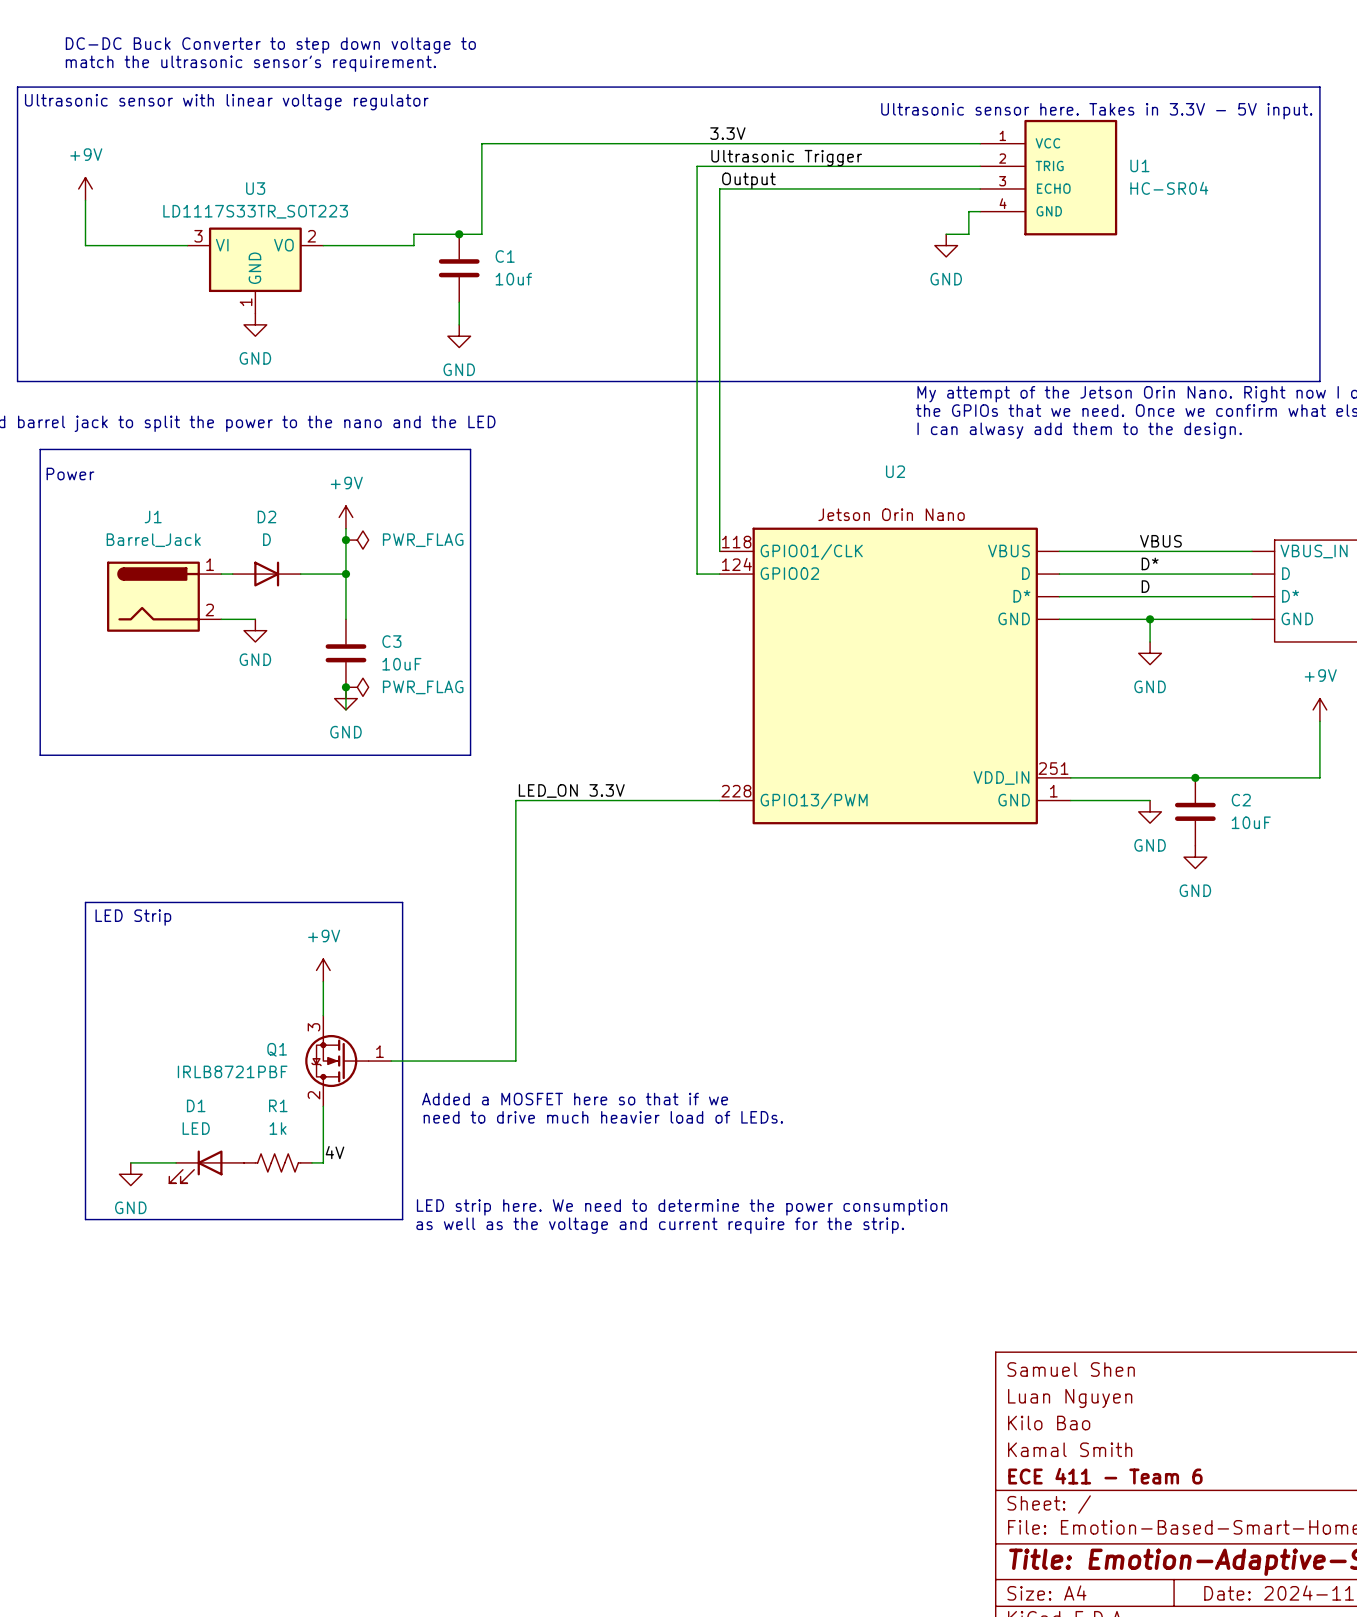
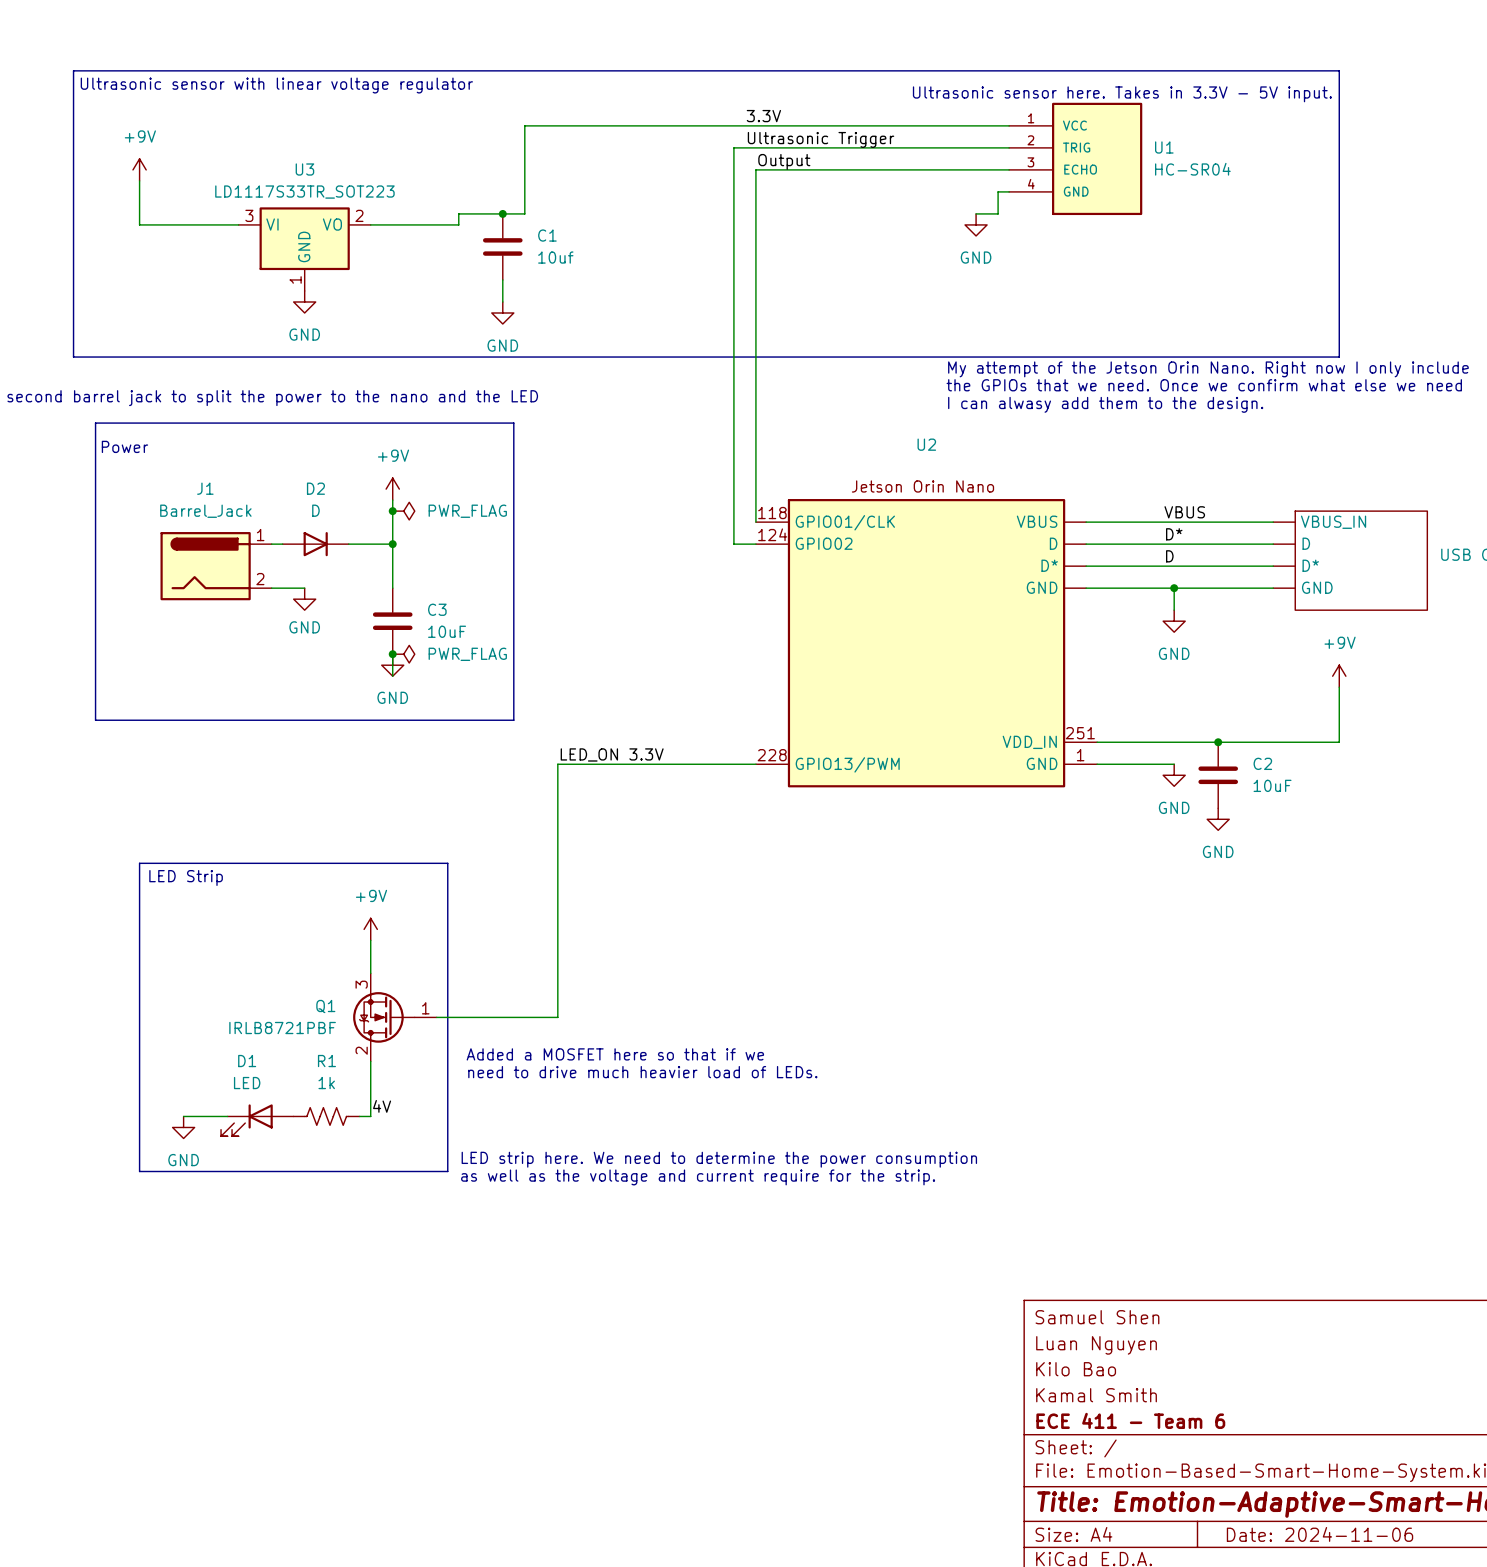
text: DC-DC Buck Converter to step down voltage to (270, 45) -> none
text: match the ultrasonic sensor's requirement. (250, 63) -> none

